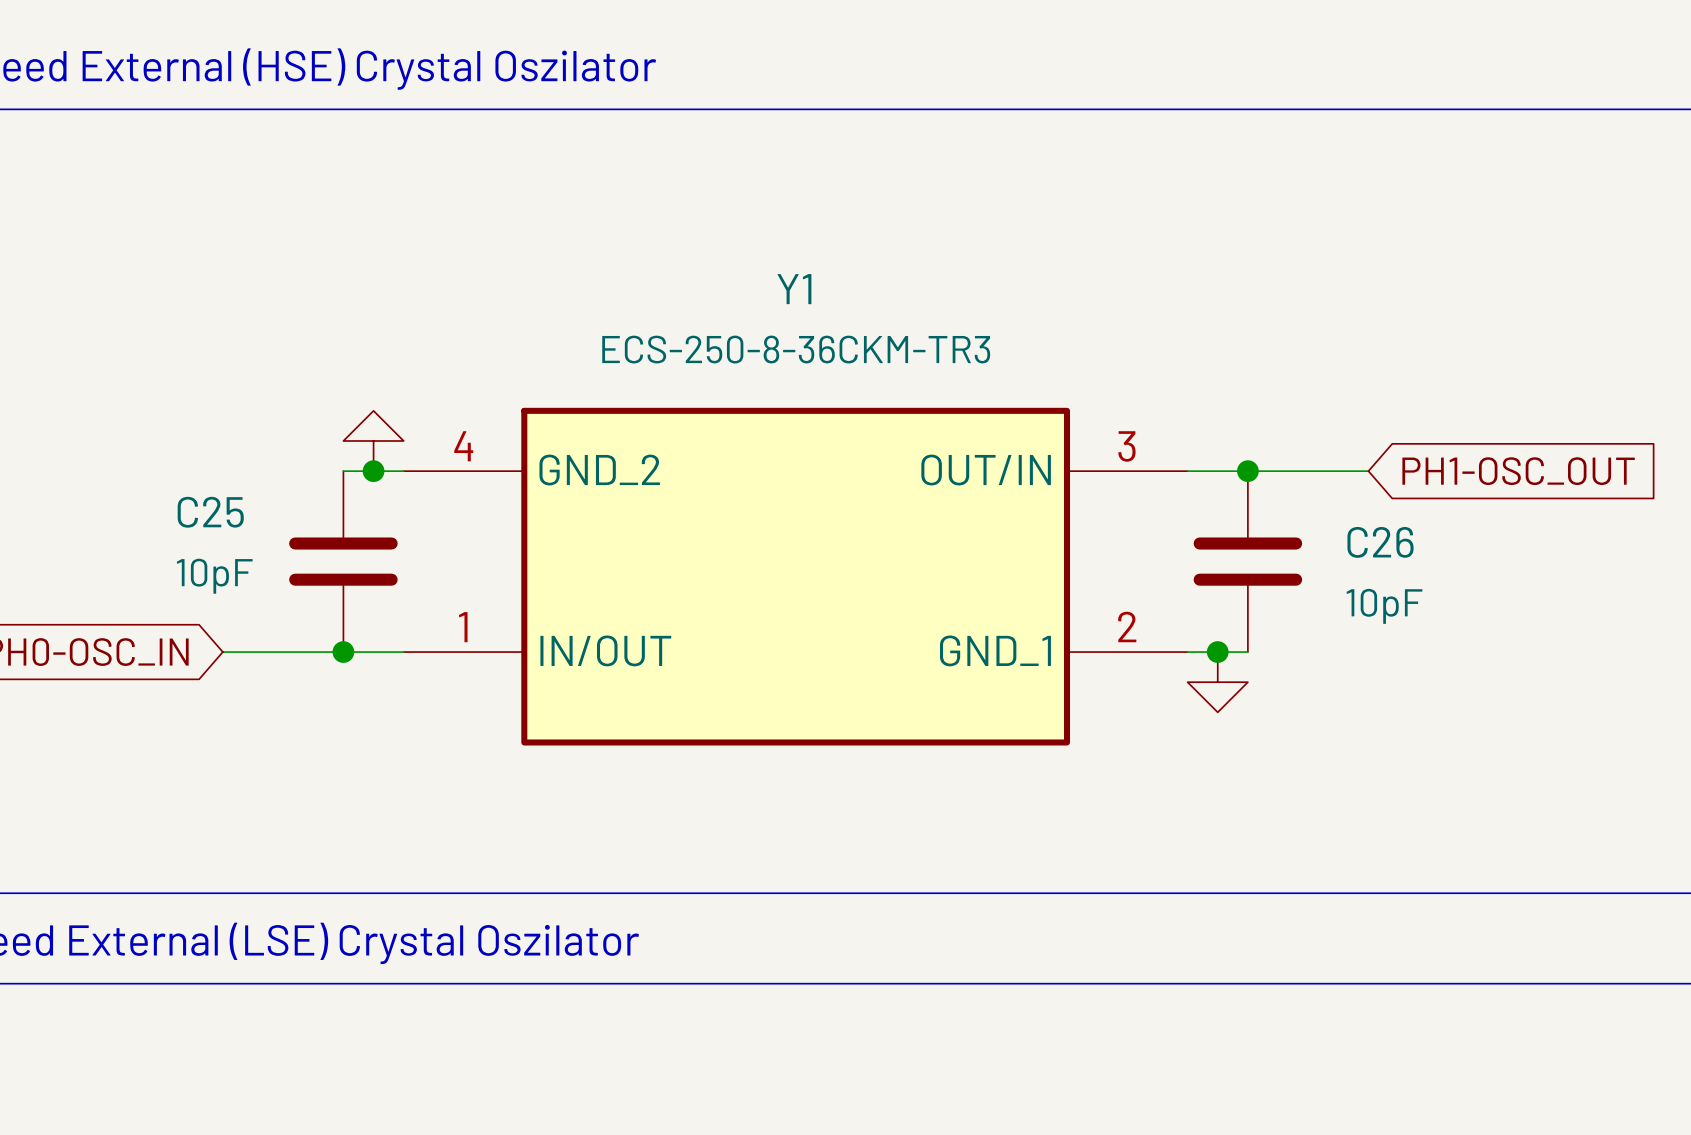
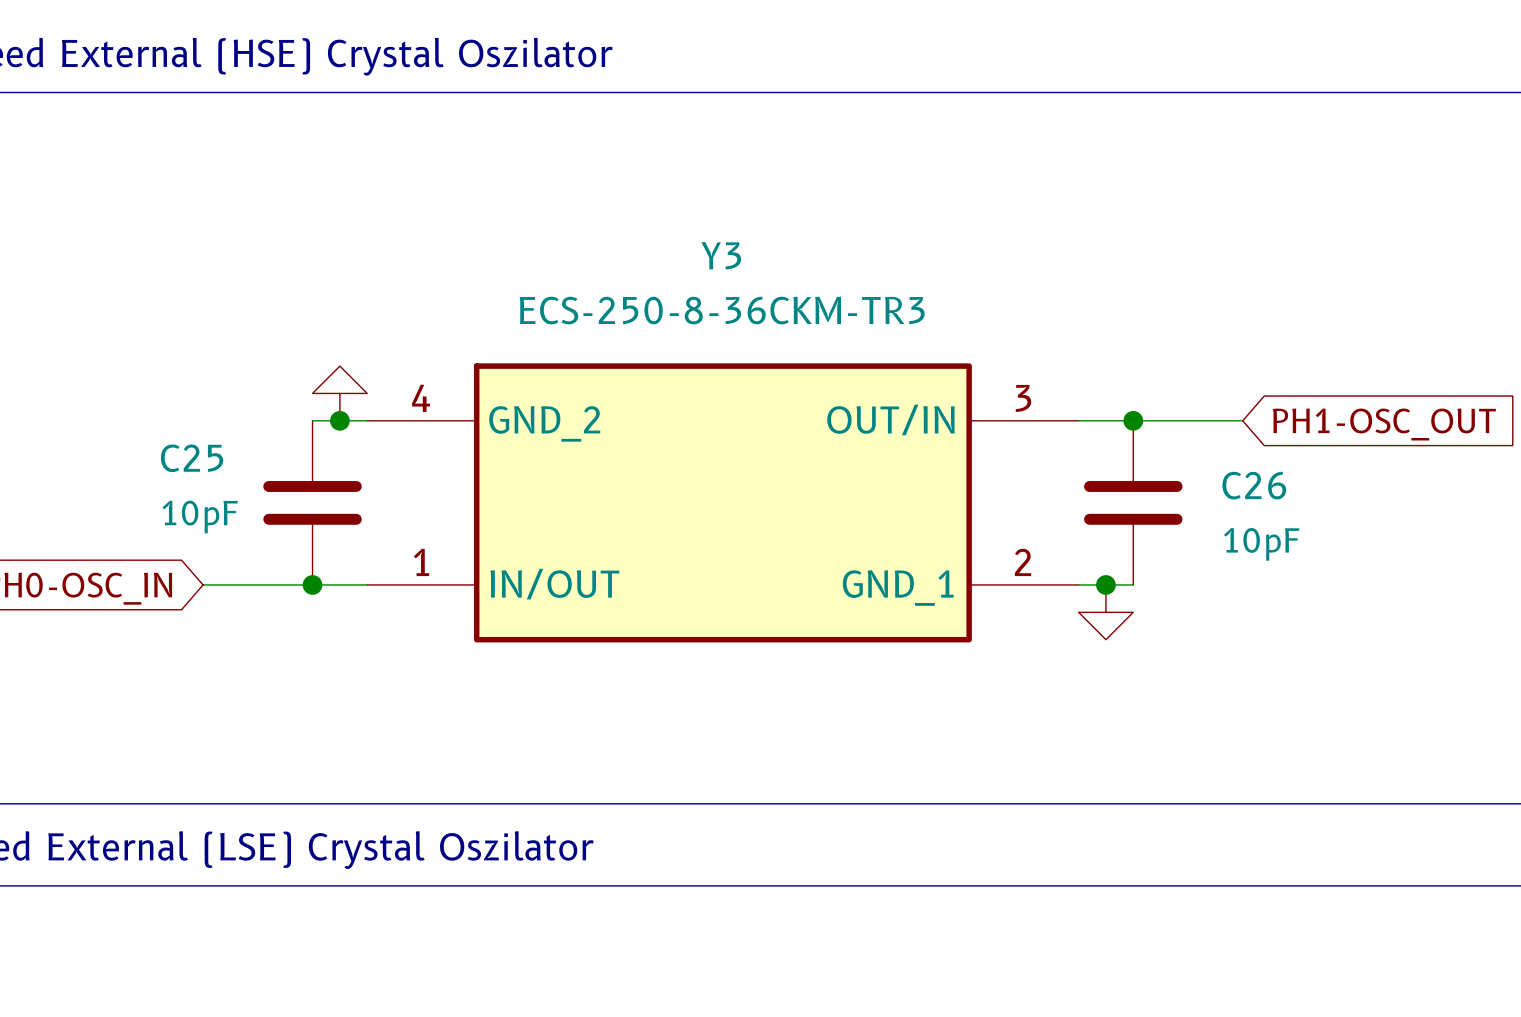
Y3: none -> ECS-250-8-36CKM-TR3 (722, 502)
Y1: ECS-250-8-36CKM-TR3 (795, 576) -> none

